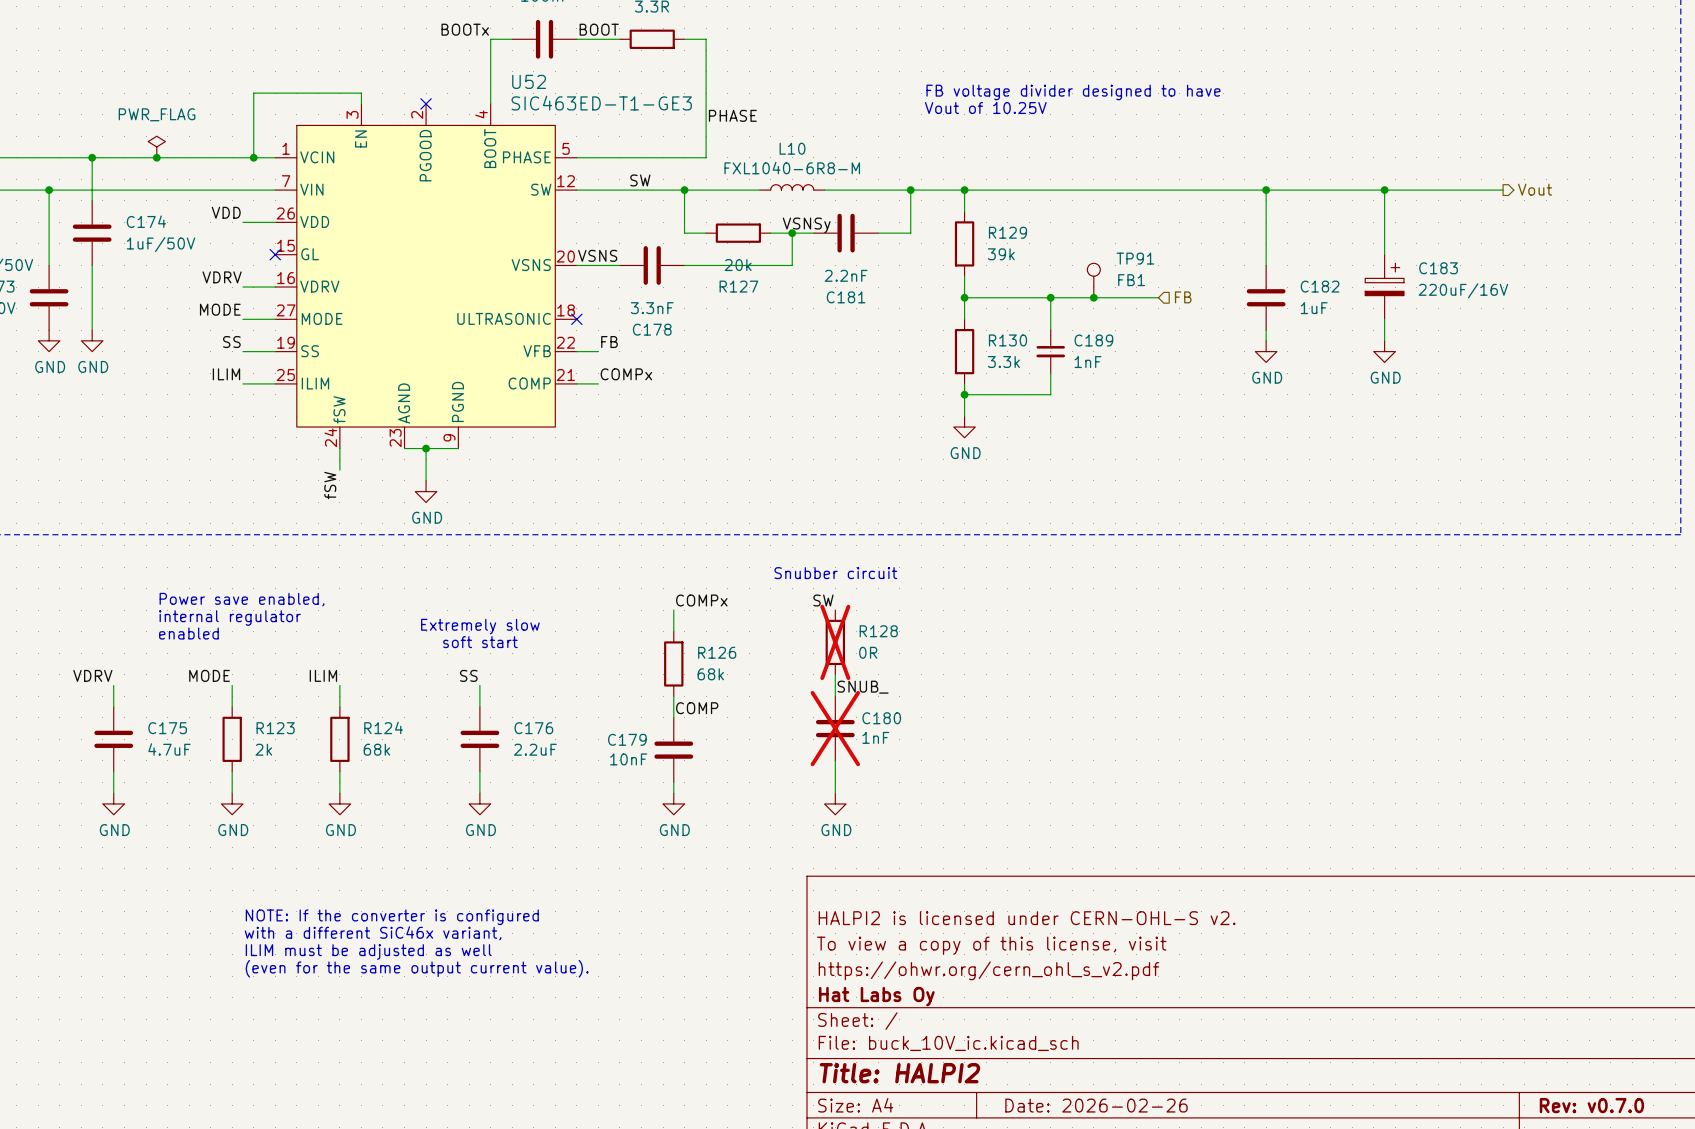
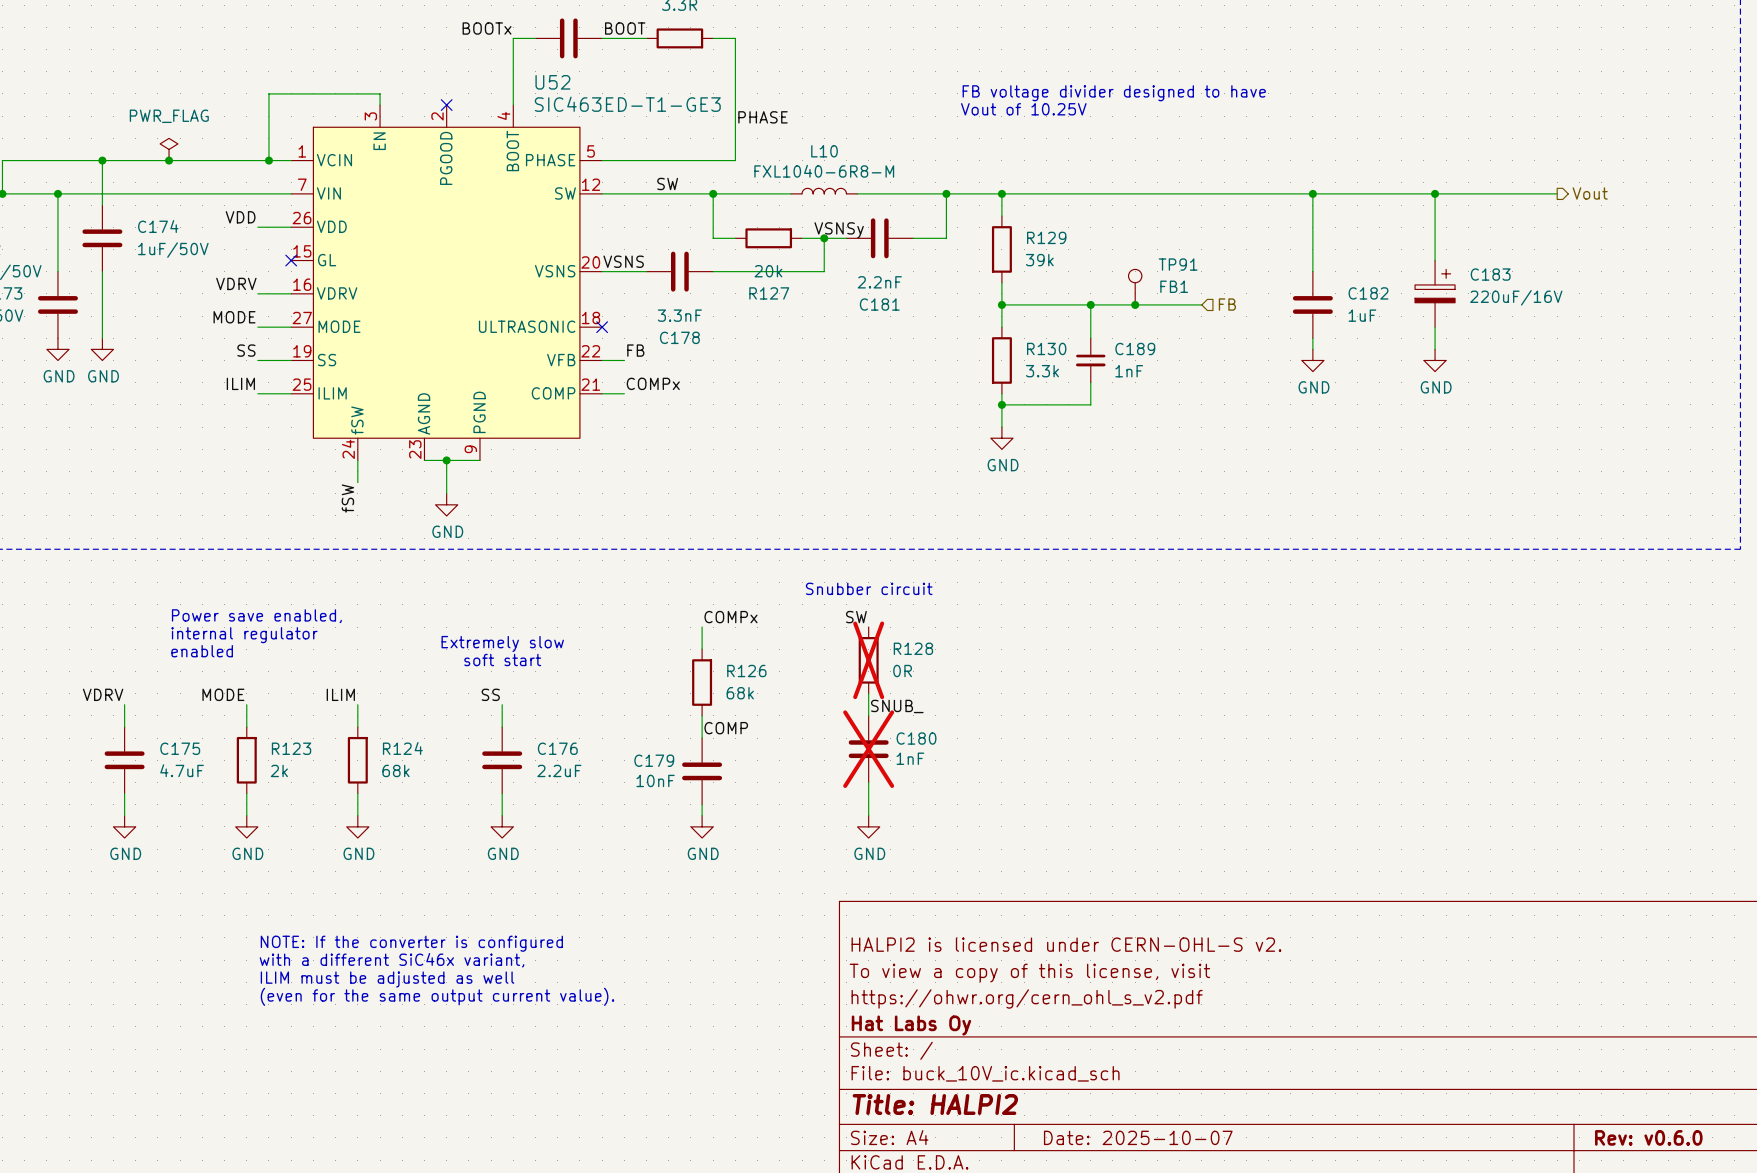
title block: Date: 2026-02-26 (1096, 1105) -> Date: 2025-10-07 (1138, 1137)
title block: Rev: v0.7.0 (1591, 1105) -> Rev: v0.6.0 (1648, 1137)

